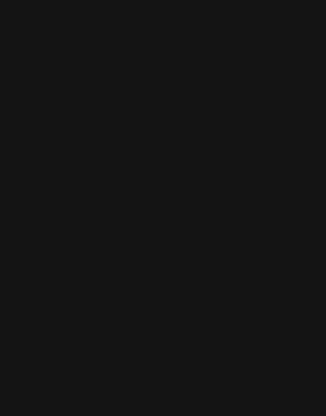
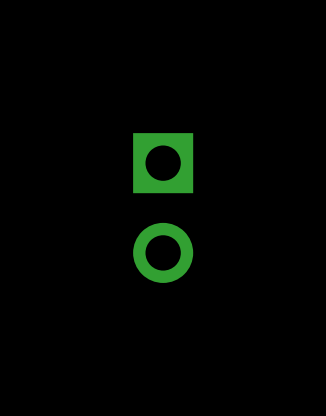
part: none -> (163, 208)

